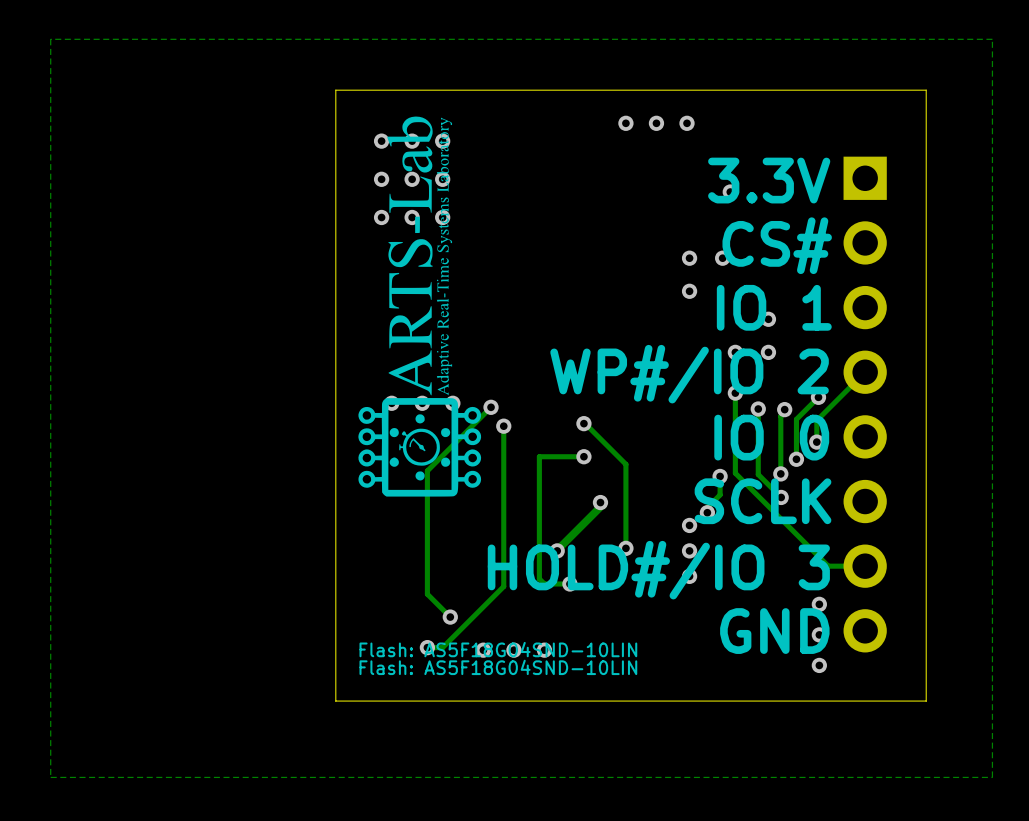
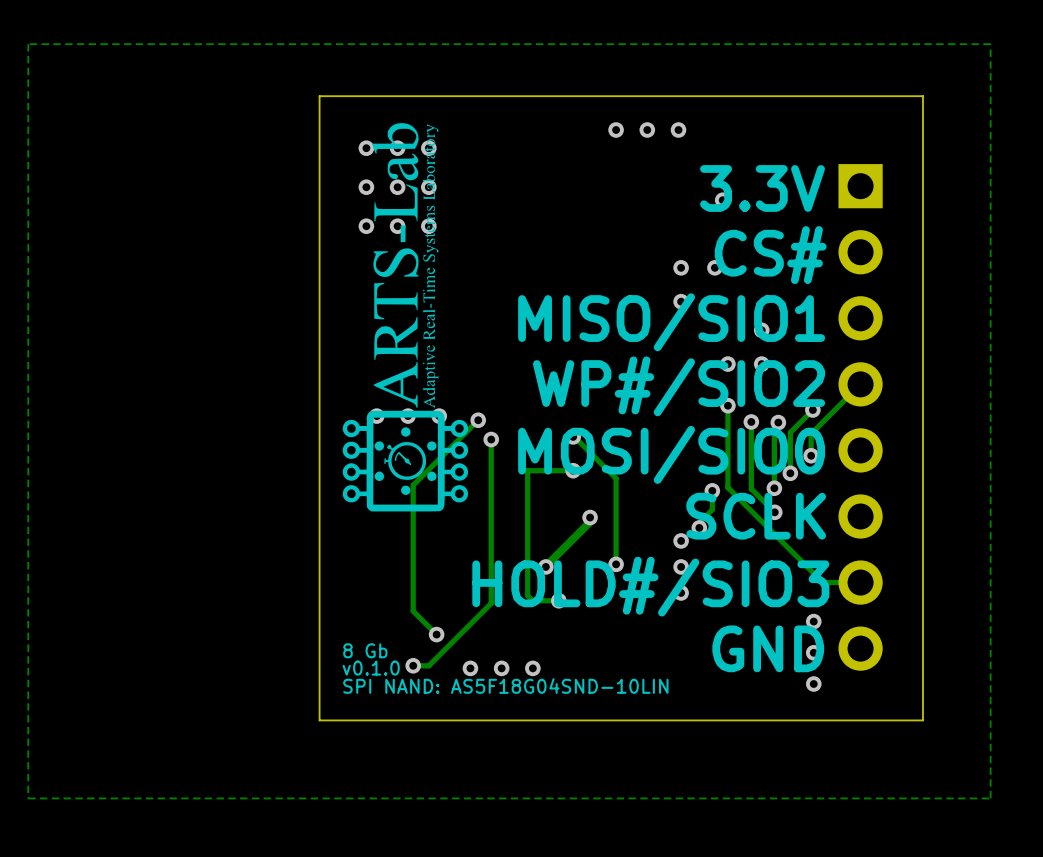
text: IO 1 (774, 307) -> none
text: none -> MISO/SIO1 (671, 322)
text: WP#/IO 2 (689, 374) -> WP#/SIO2 (679, 386)
text: IO 0 (771, 437) -> none
text: none -> MOSI/SIO0 (671, 454)
text: HOLD#/IO 3 (658, 570) -> HOLD#/SIO3 (650, 586)
text: none -> 8 Gb (365, 650)
text: Flash: AS5F18G04SND-10LIN (498, 649) -> v0.1.0 (371, 668)
text: Flash: AS5F18G04SND-10LIN (498, 667) -> SPI NAND: AS5F18G04SND-10LIN (505, 686)

